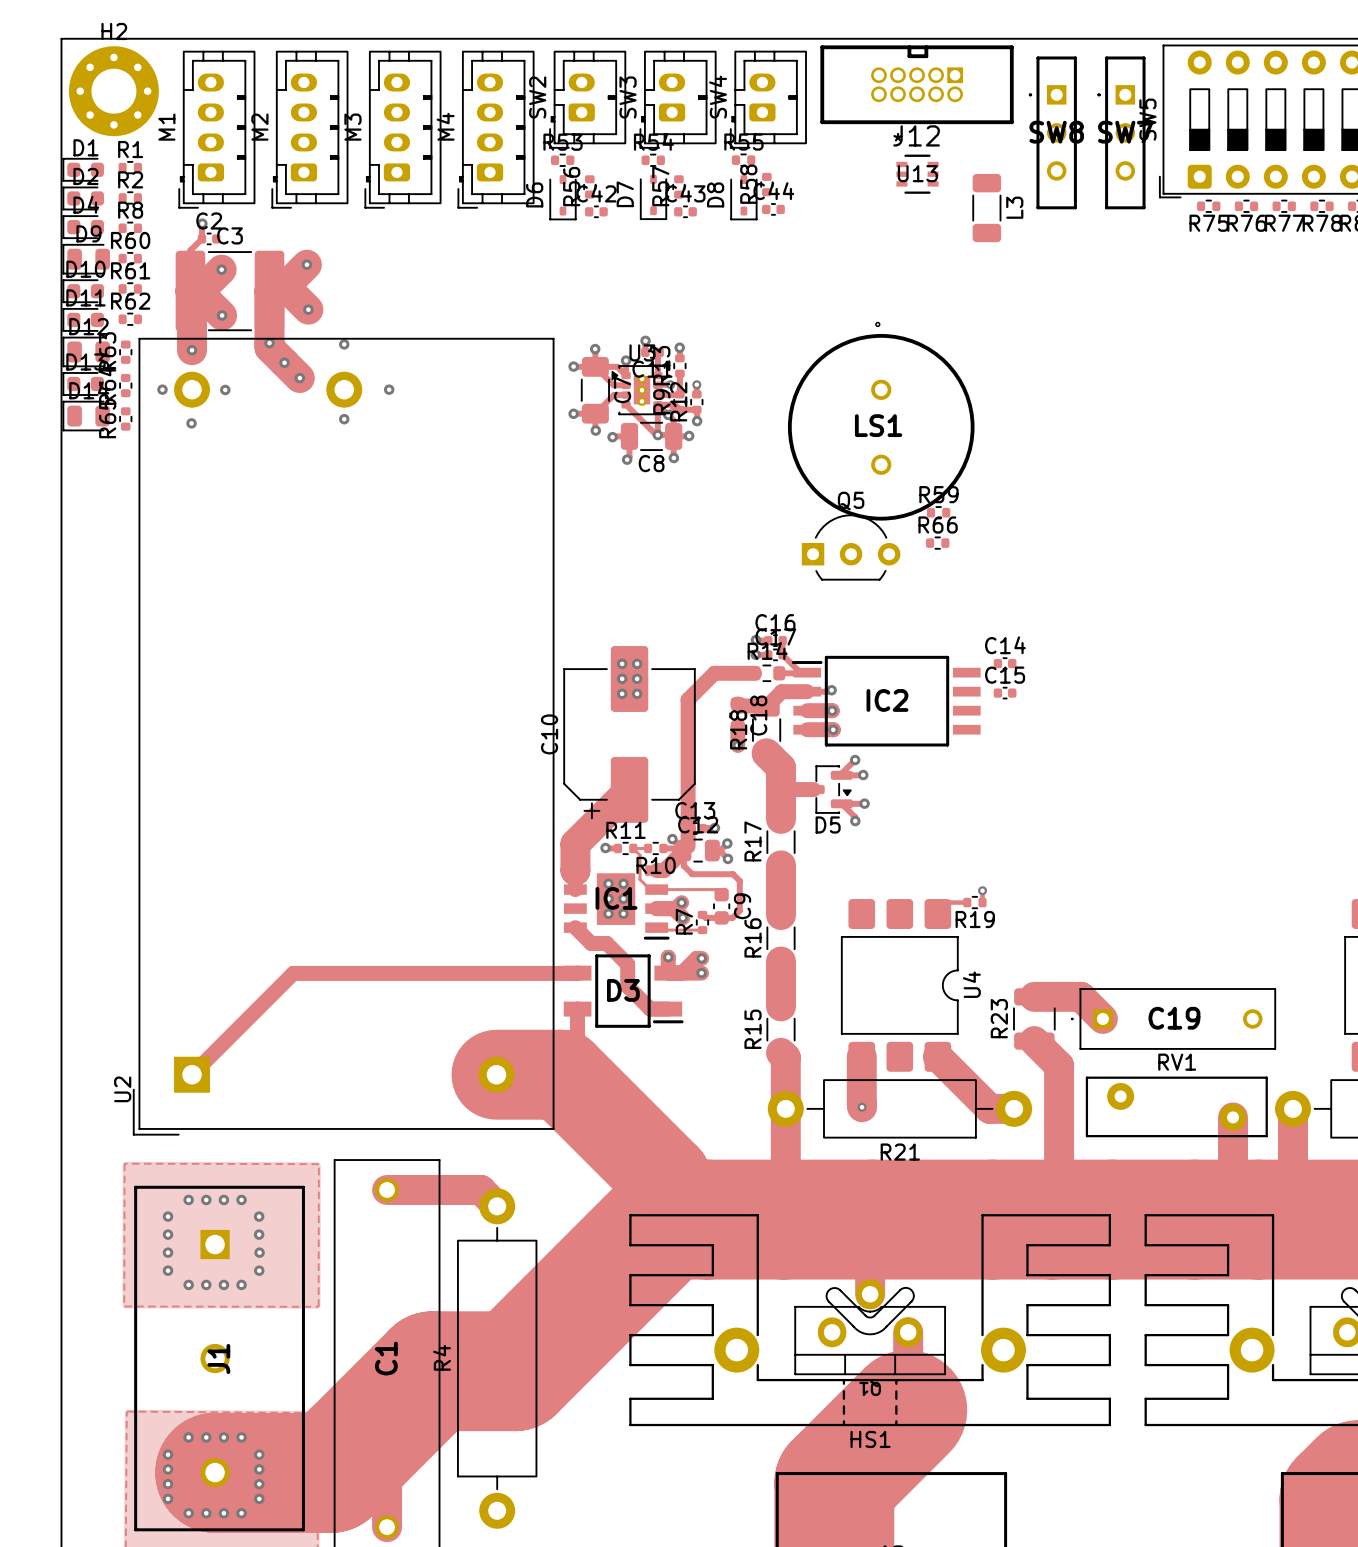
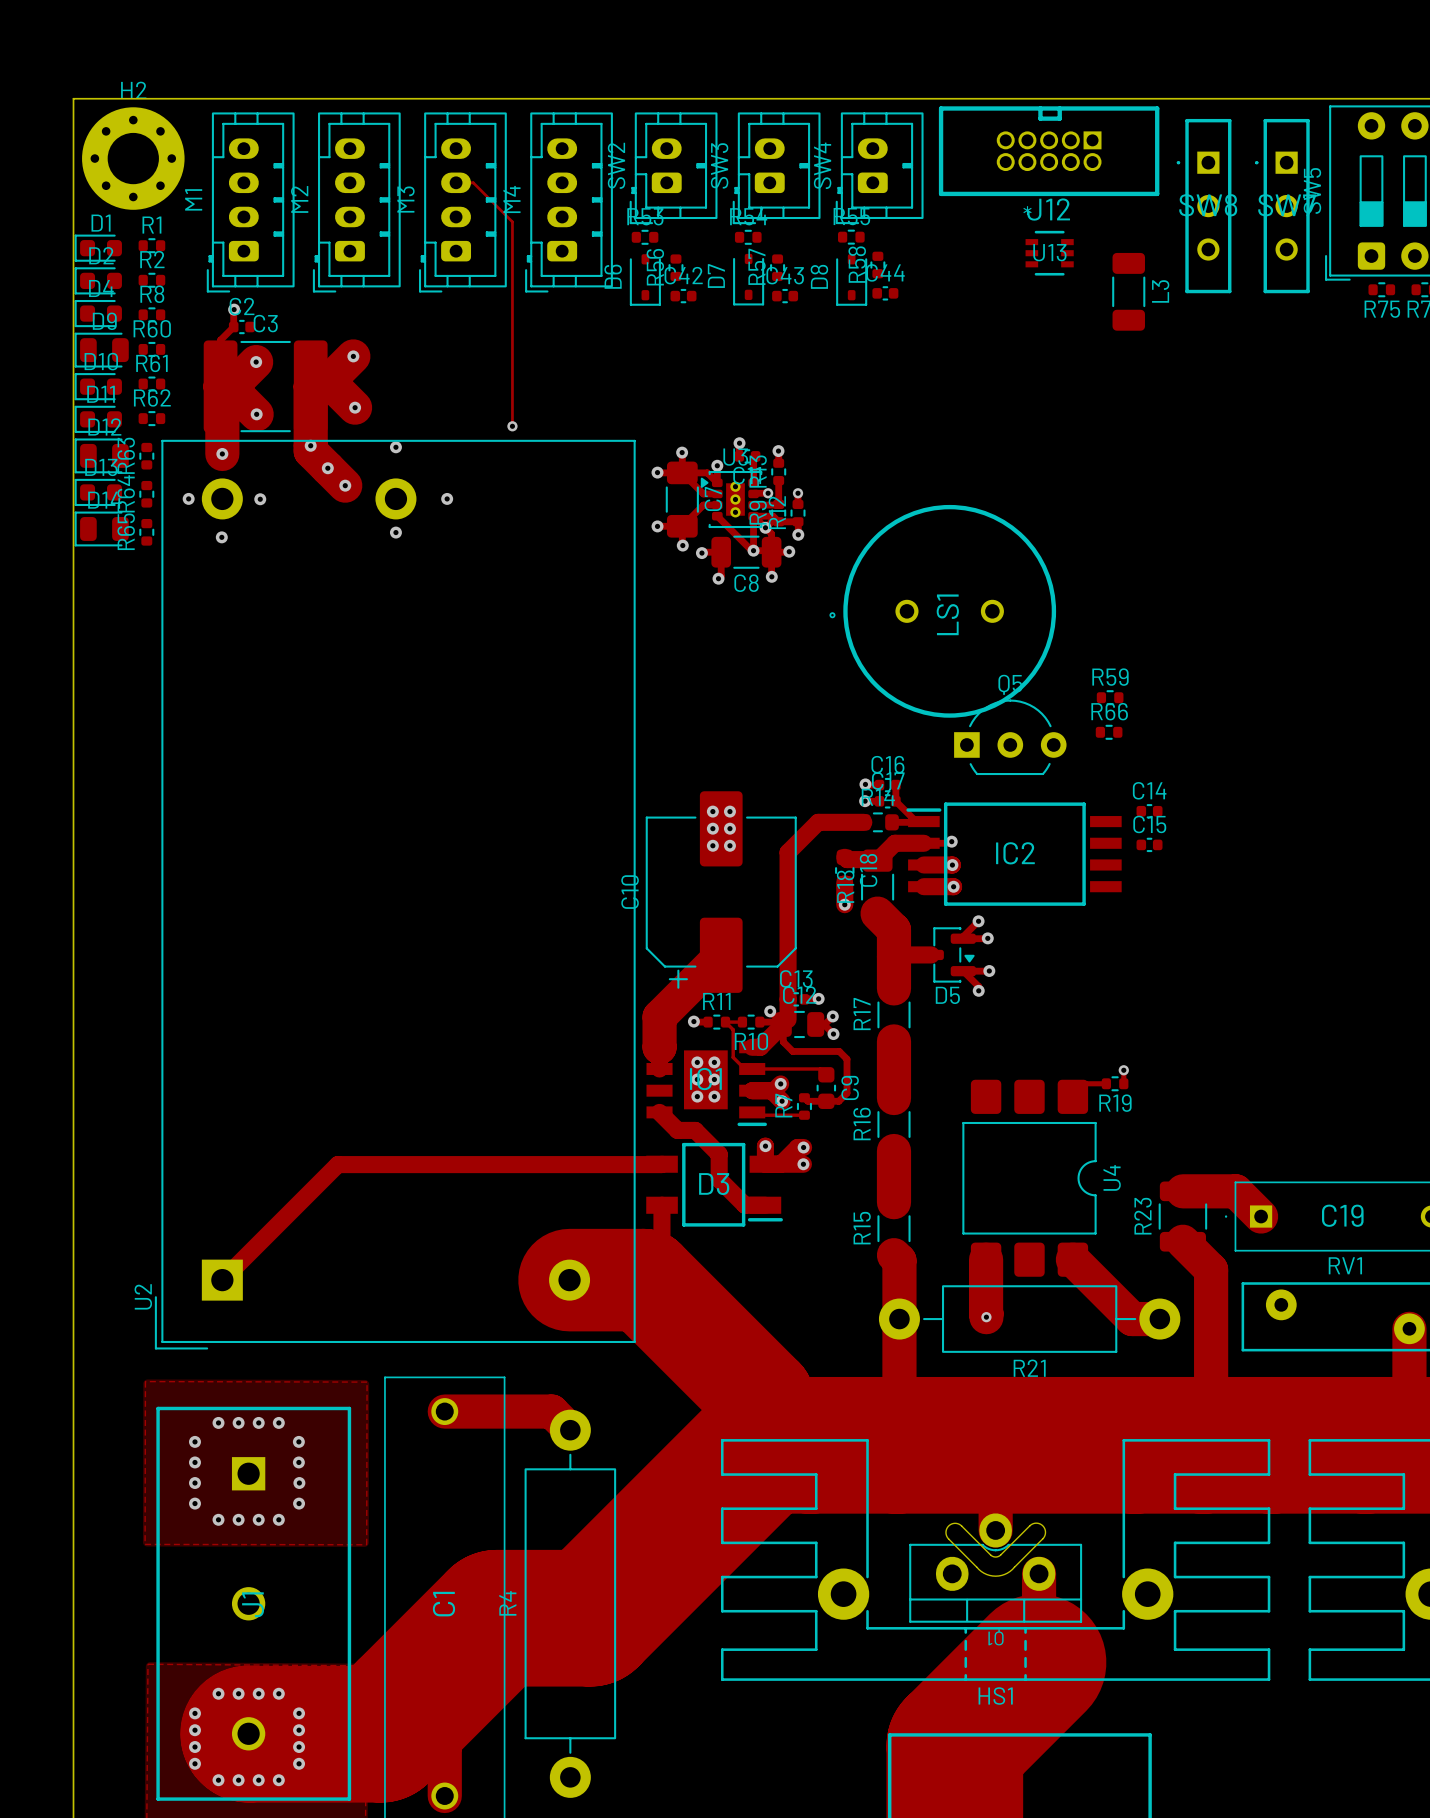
track: none -> (456, 182) (473, 182) (512, 221) (512, 426)
via: none -> (512, 426)
LS1 rotation: 0° (881, 421) -> 90° counterclockwise (942, 611)
R59 position: (938, 512) -> (1110, 697)
R66 position: (937, 543) -> (1109, 732)
Q5 position: (851, 547) -> (1010, 737)

